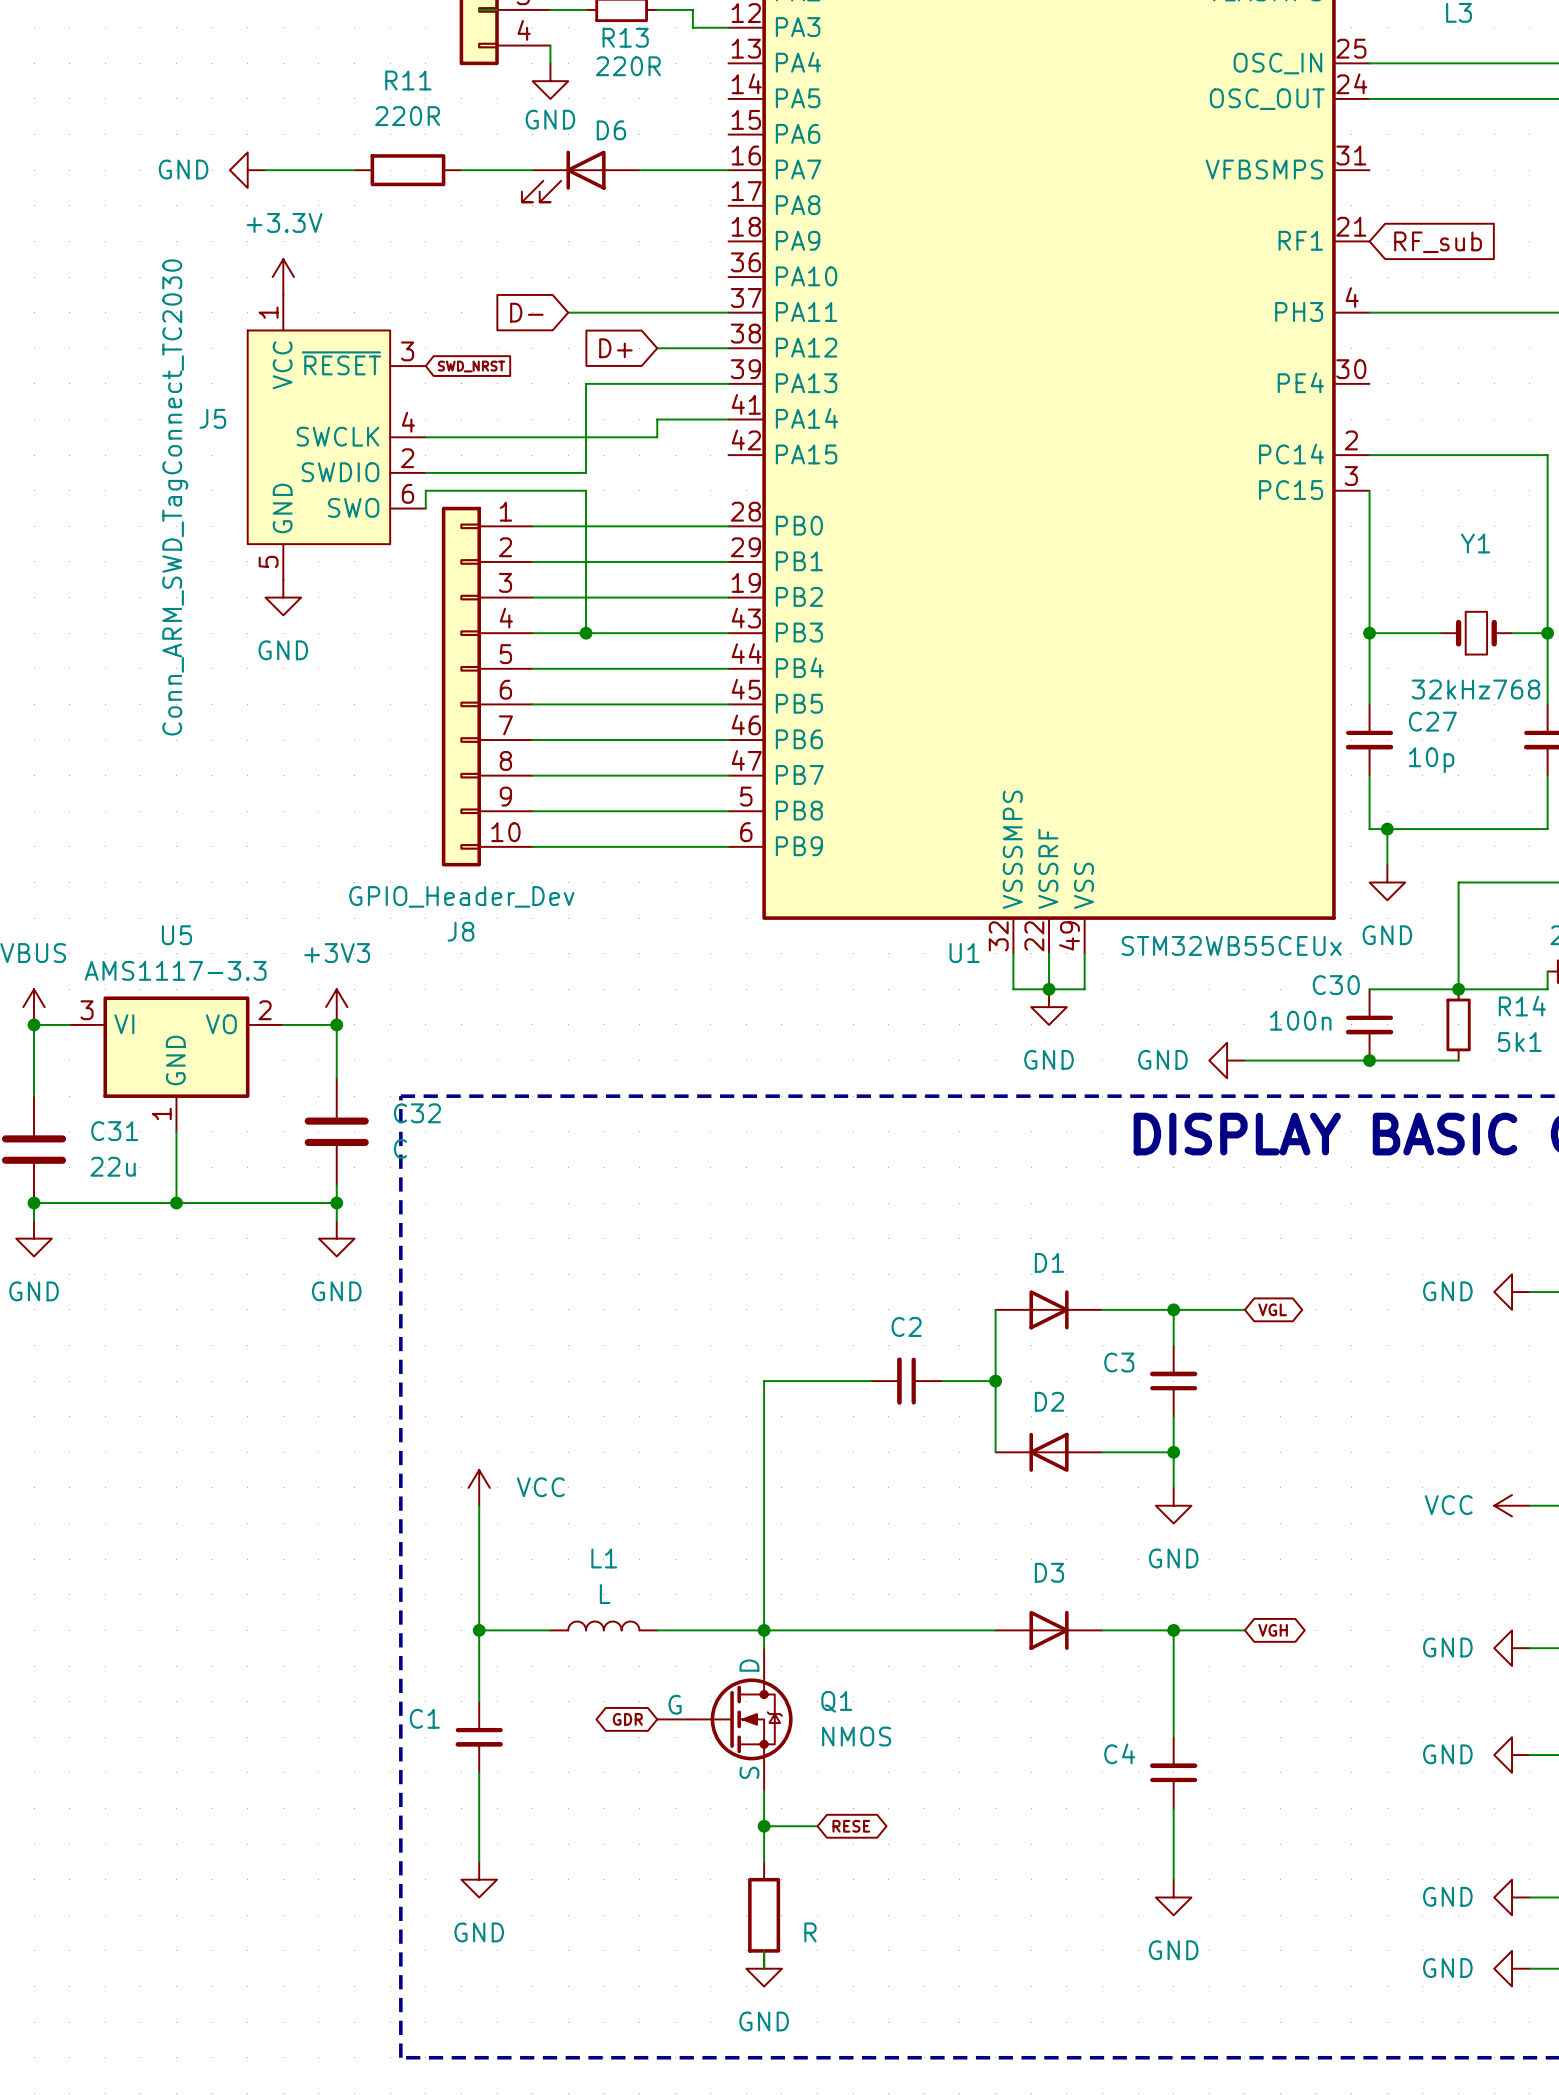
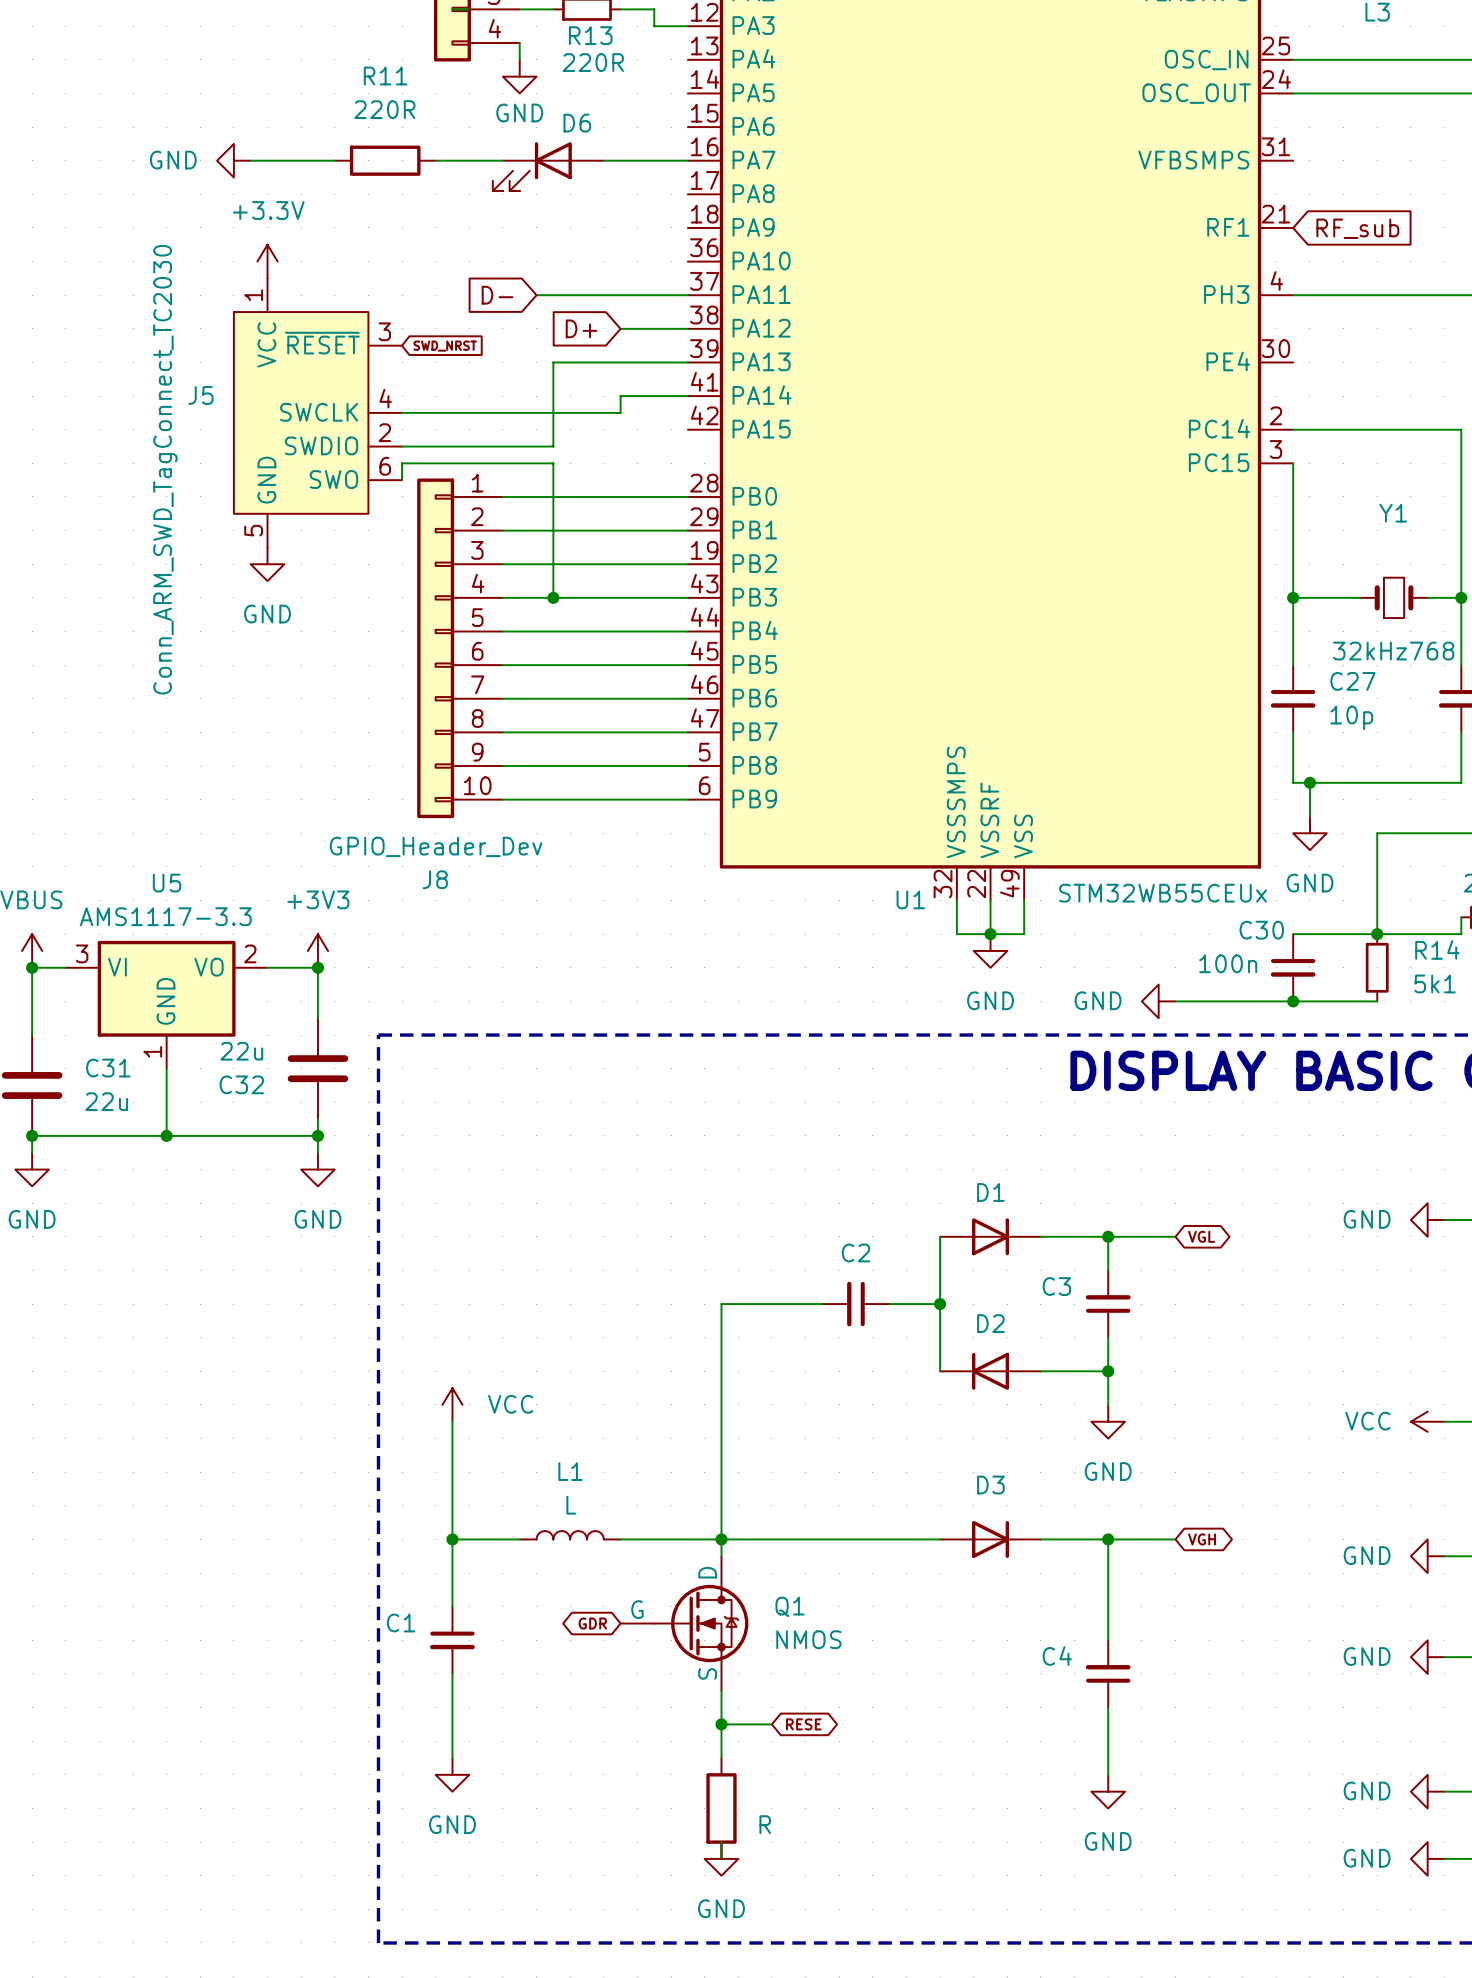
C32 name position: C32 (417, 1113) -> C32 (241, 1084)
C32 value: C (400, 1148) -> 22u (241, 1051)

